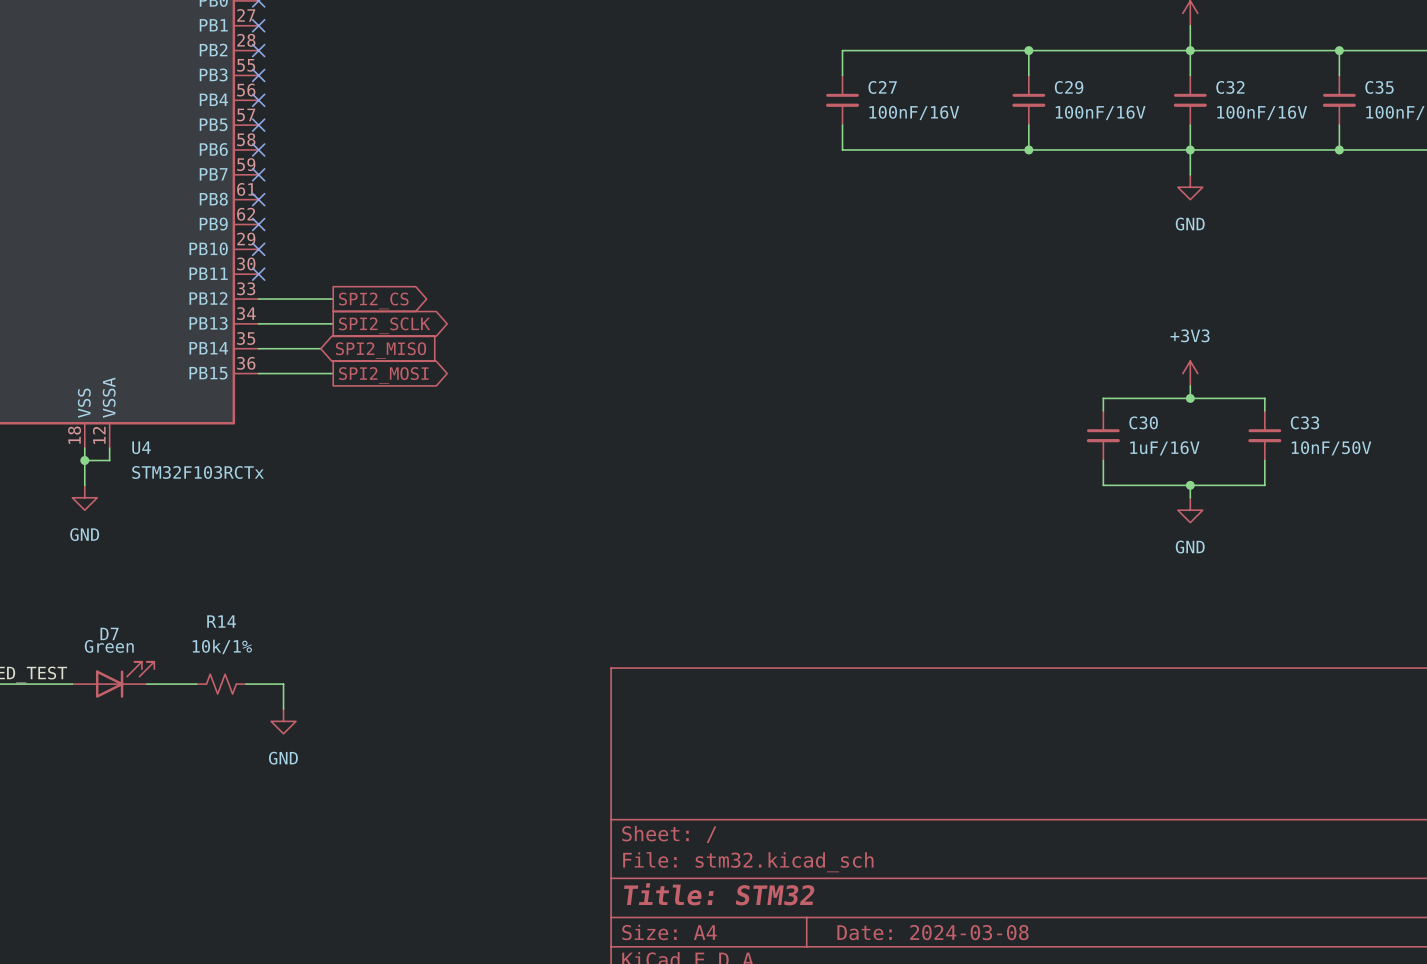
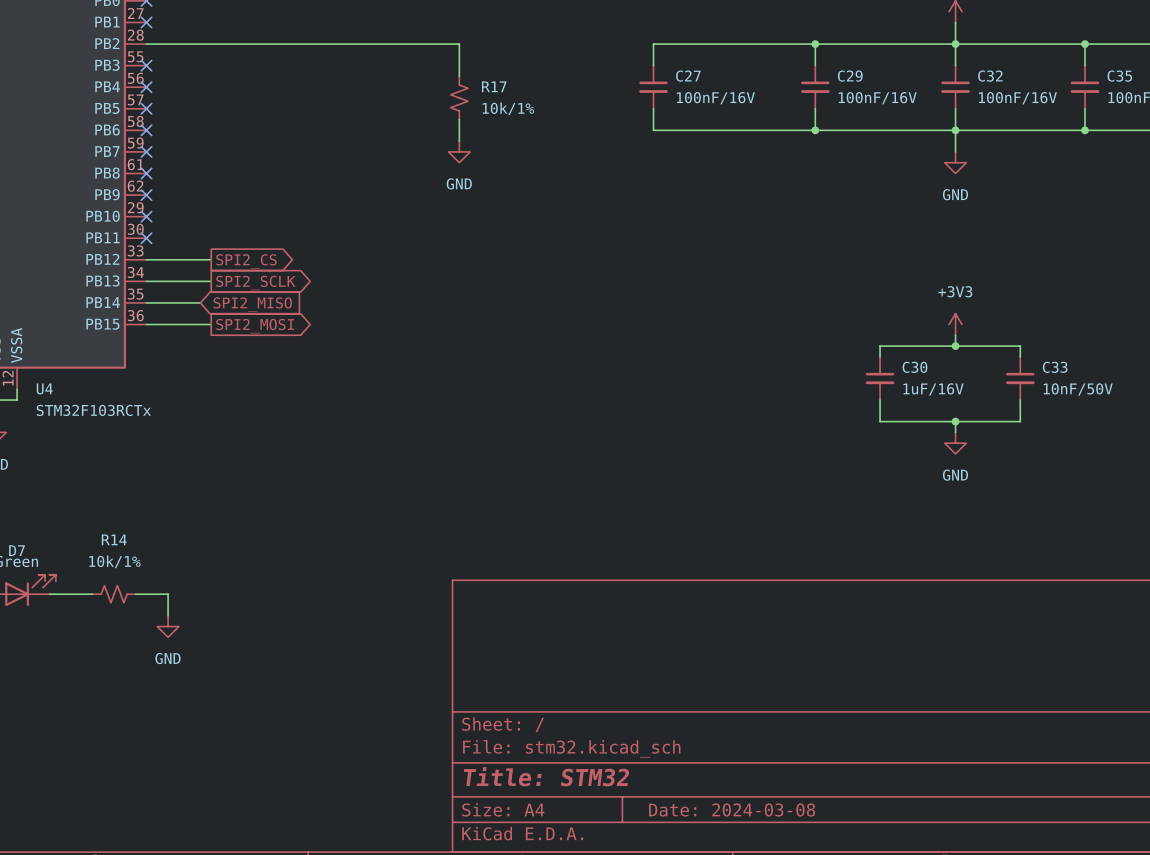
wire: none -> (146, 44) (459, 44) (459, 76)
no-connect mark: (258, 50) -> none
R17: none -> 10k/1% (459, 97)
wire: none -> (459, 119) (459, 141)
power symbol: none -> GND (459, 151)

